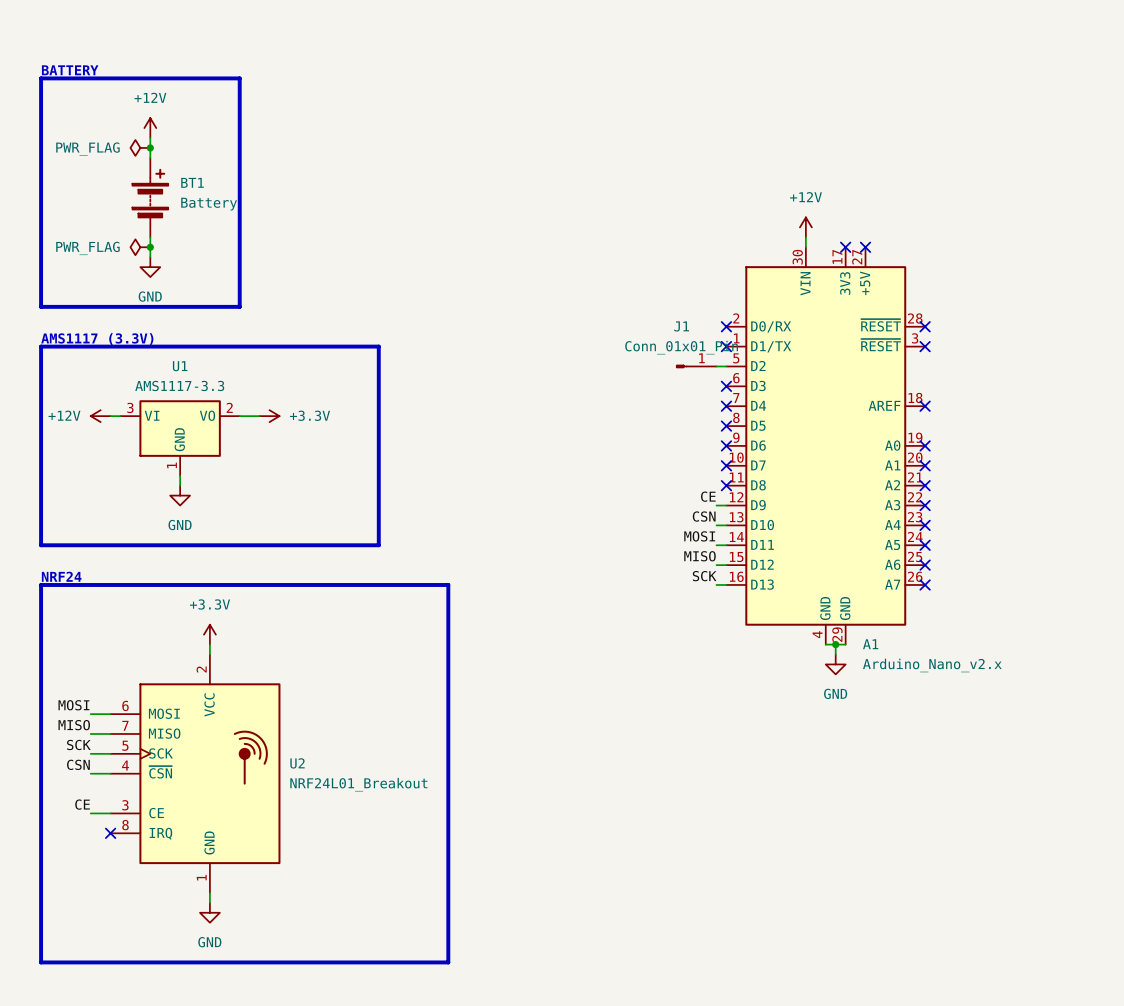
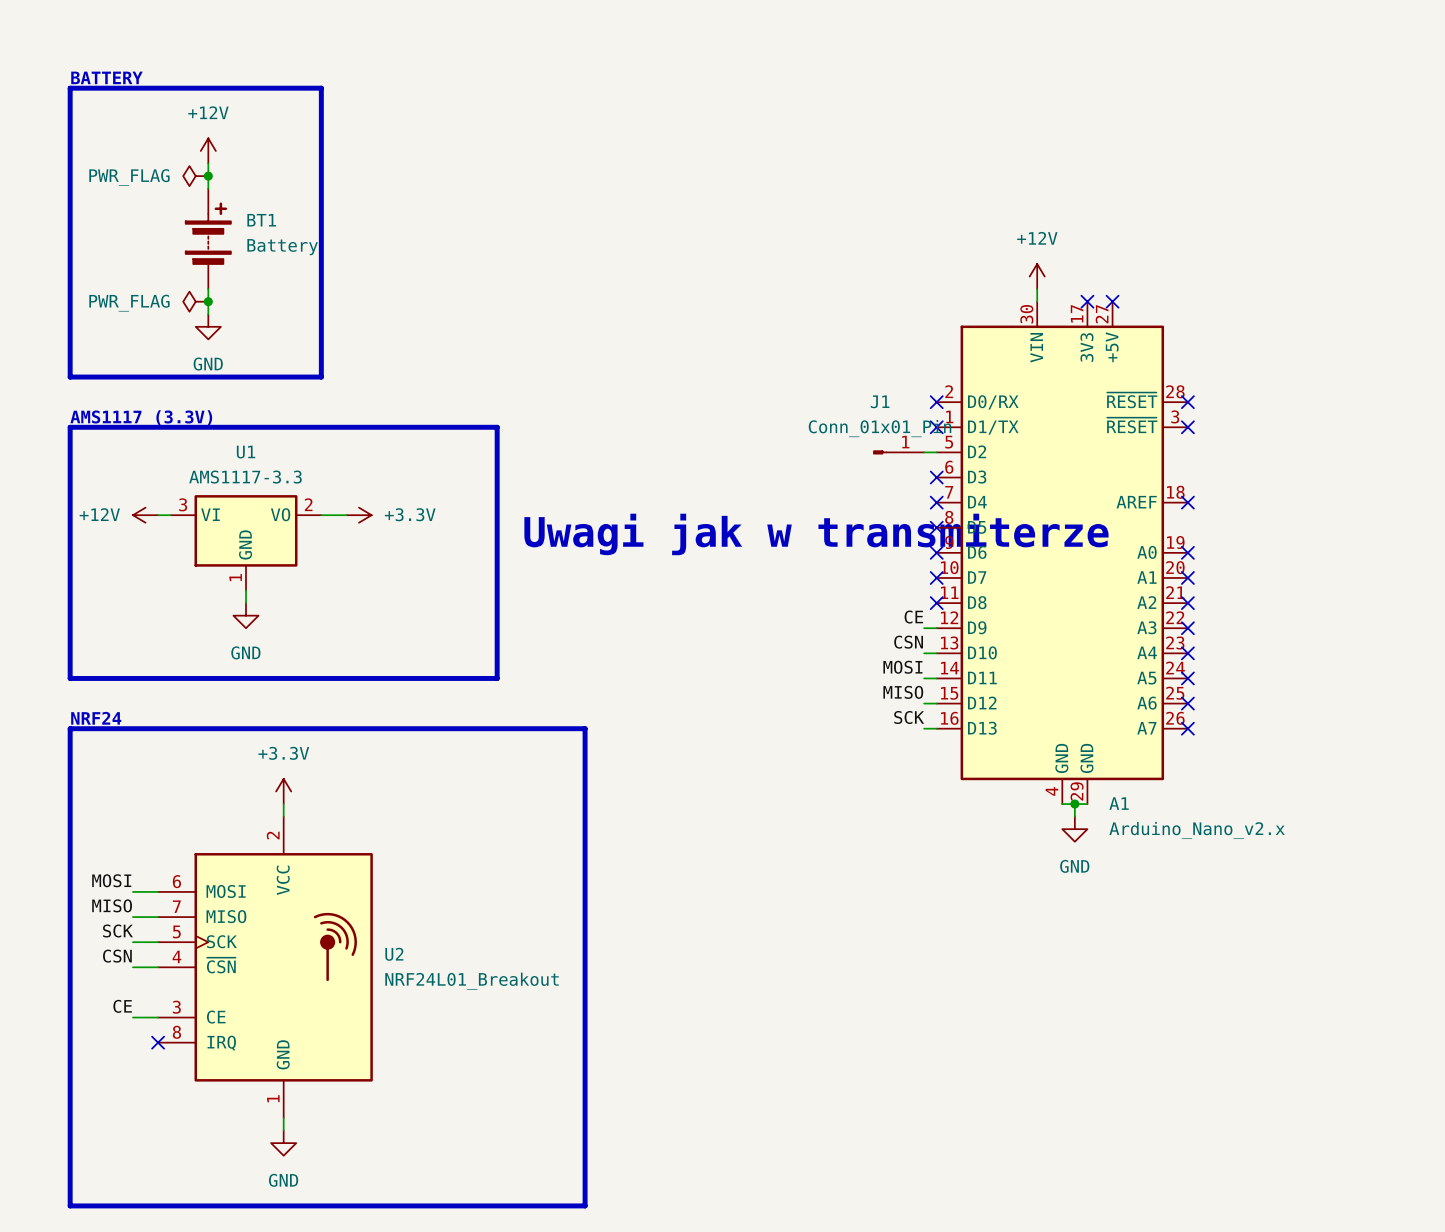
text: none -> Uwagi jak w transmiterze (816, 534)

